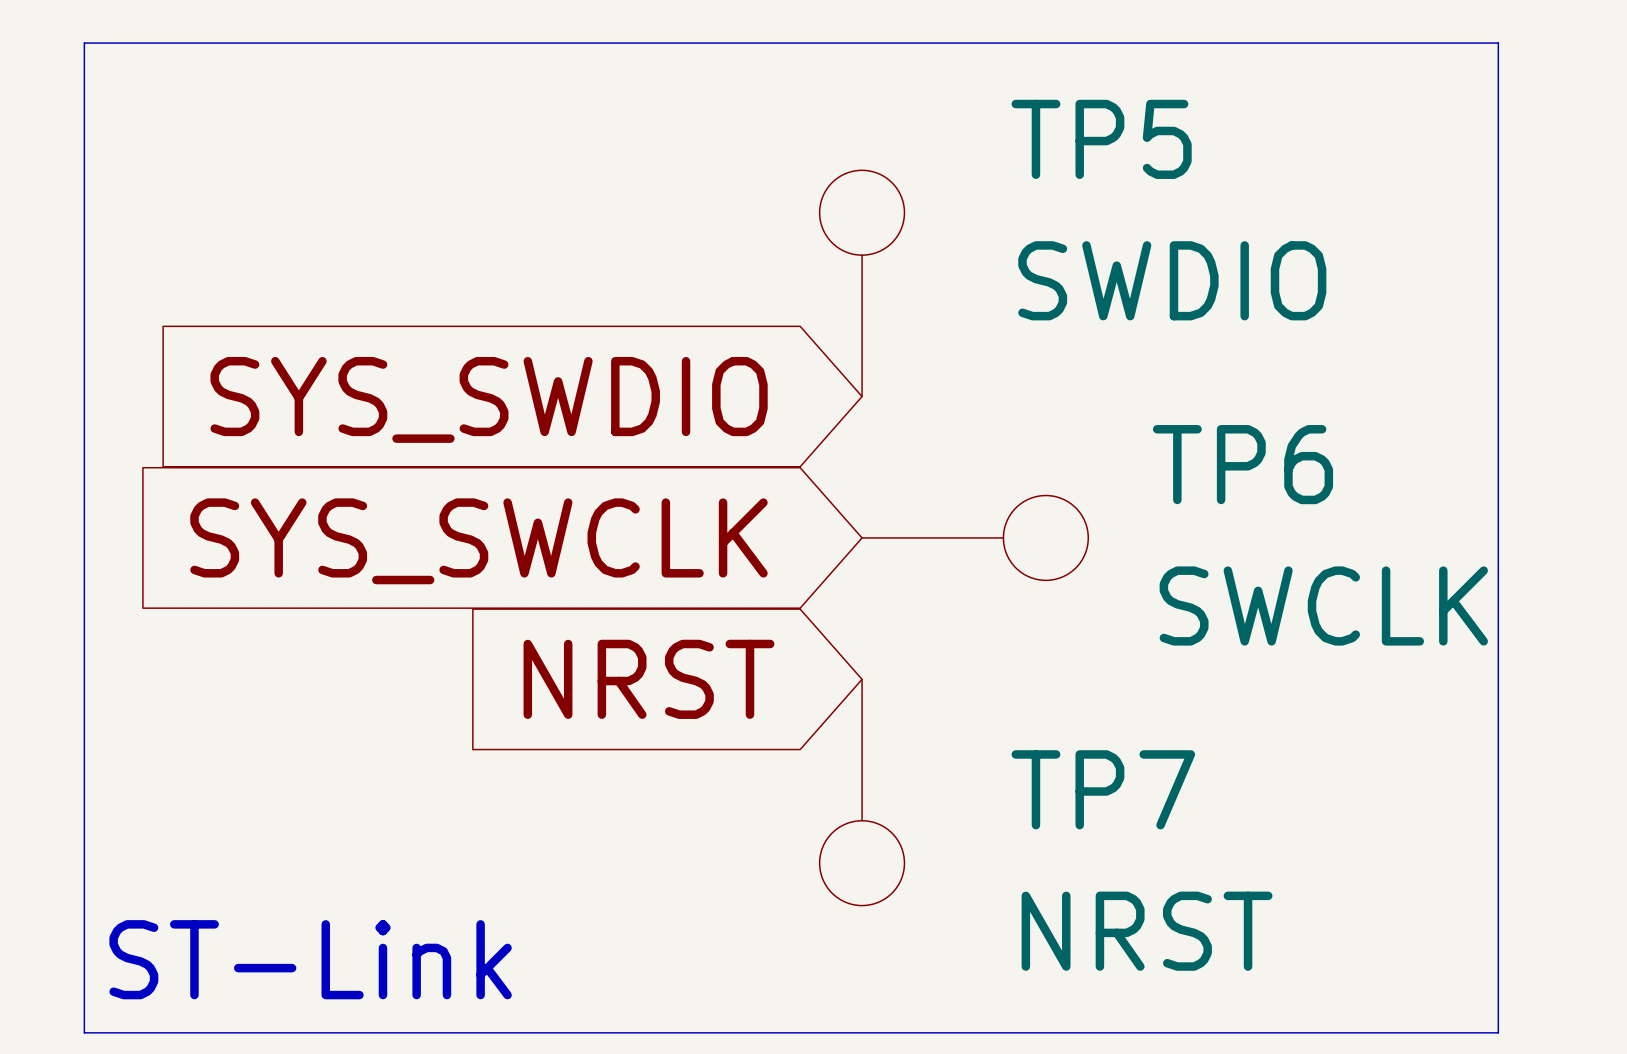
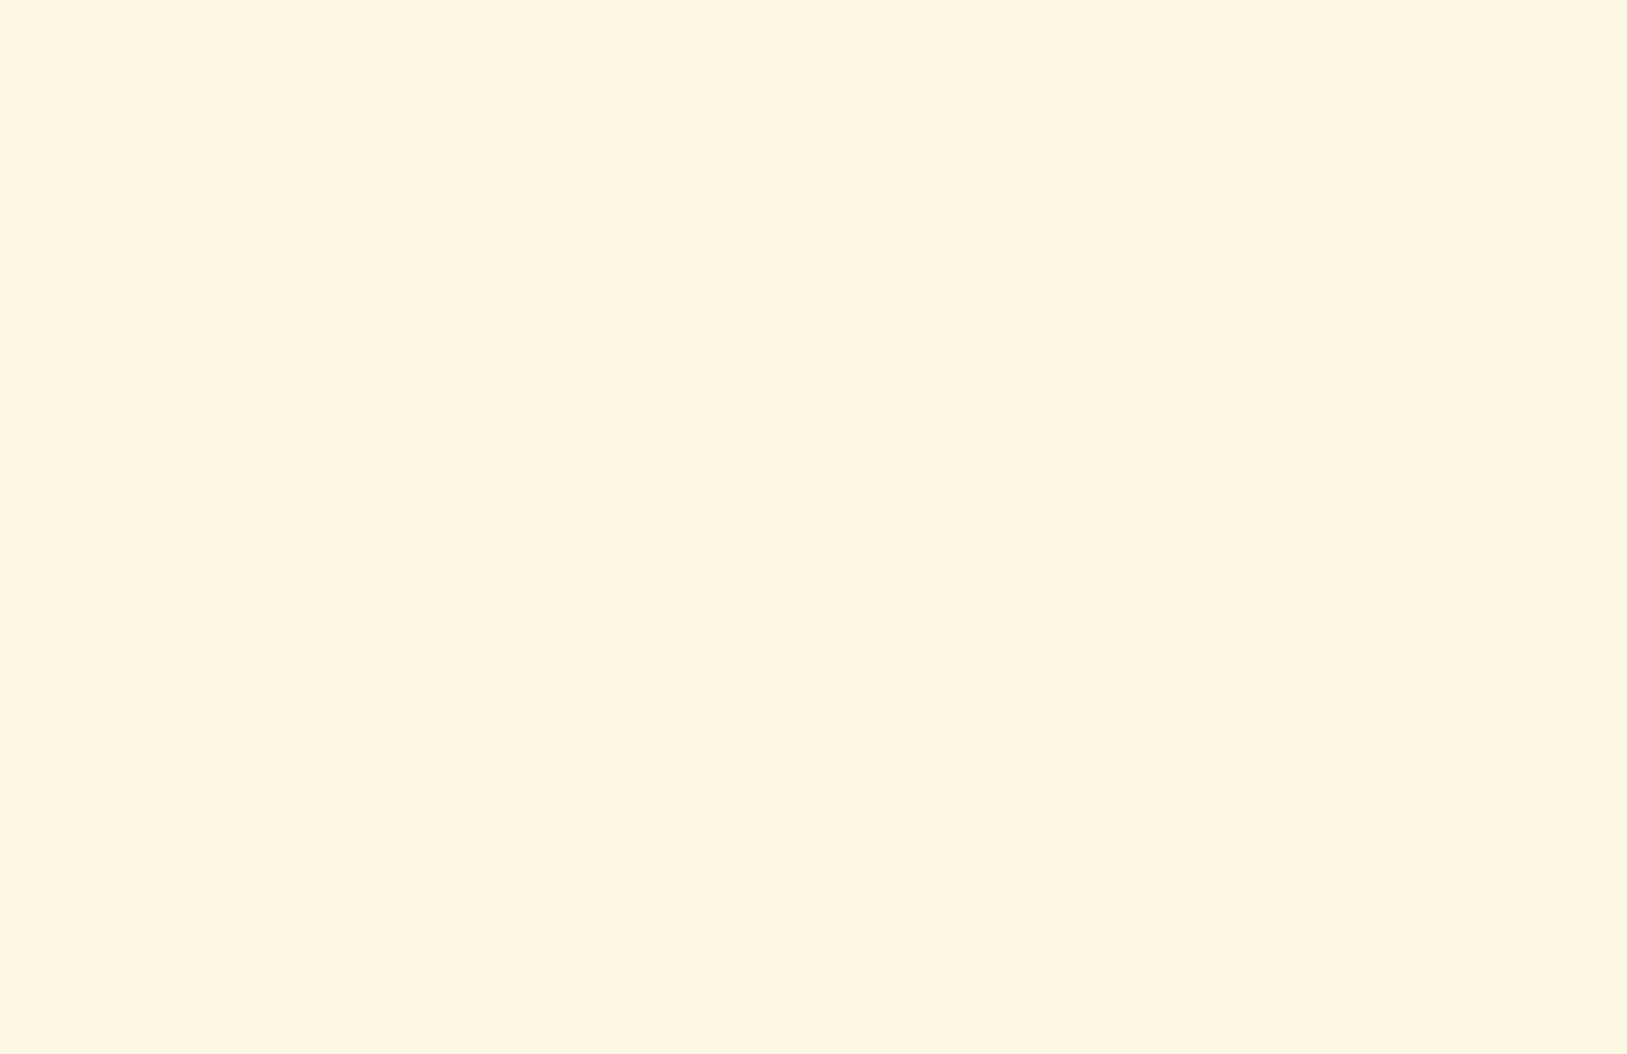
line: (84, 43) (1498, 43) (1498, 1032) (84, 1032) (84, 43) -> none
TP5: SWDIO (862, 283) -> none
global label: SYS_SWDIO (489, 399) -> none
TP6: SWCLK (975, 537) -> none
global label: SYS_SWCLK (478, 541) -> none
global label: NRST (649, 679) -> none
TP7: NRST (862, 792) -> none
text: ST-Link (310, 959) -> none

